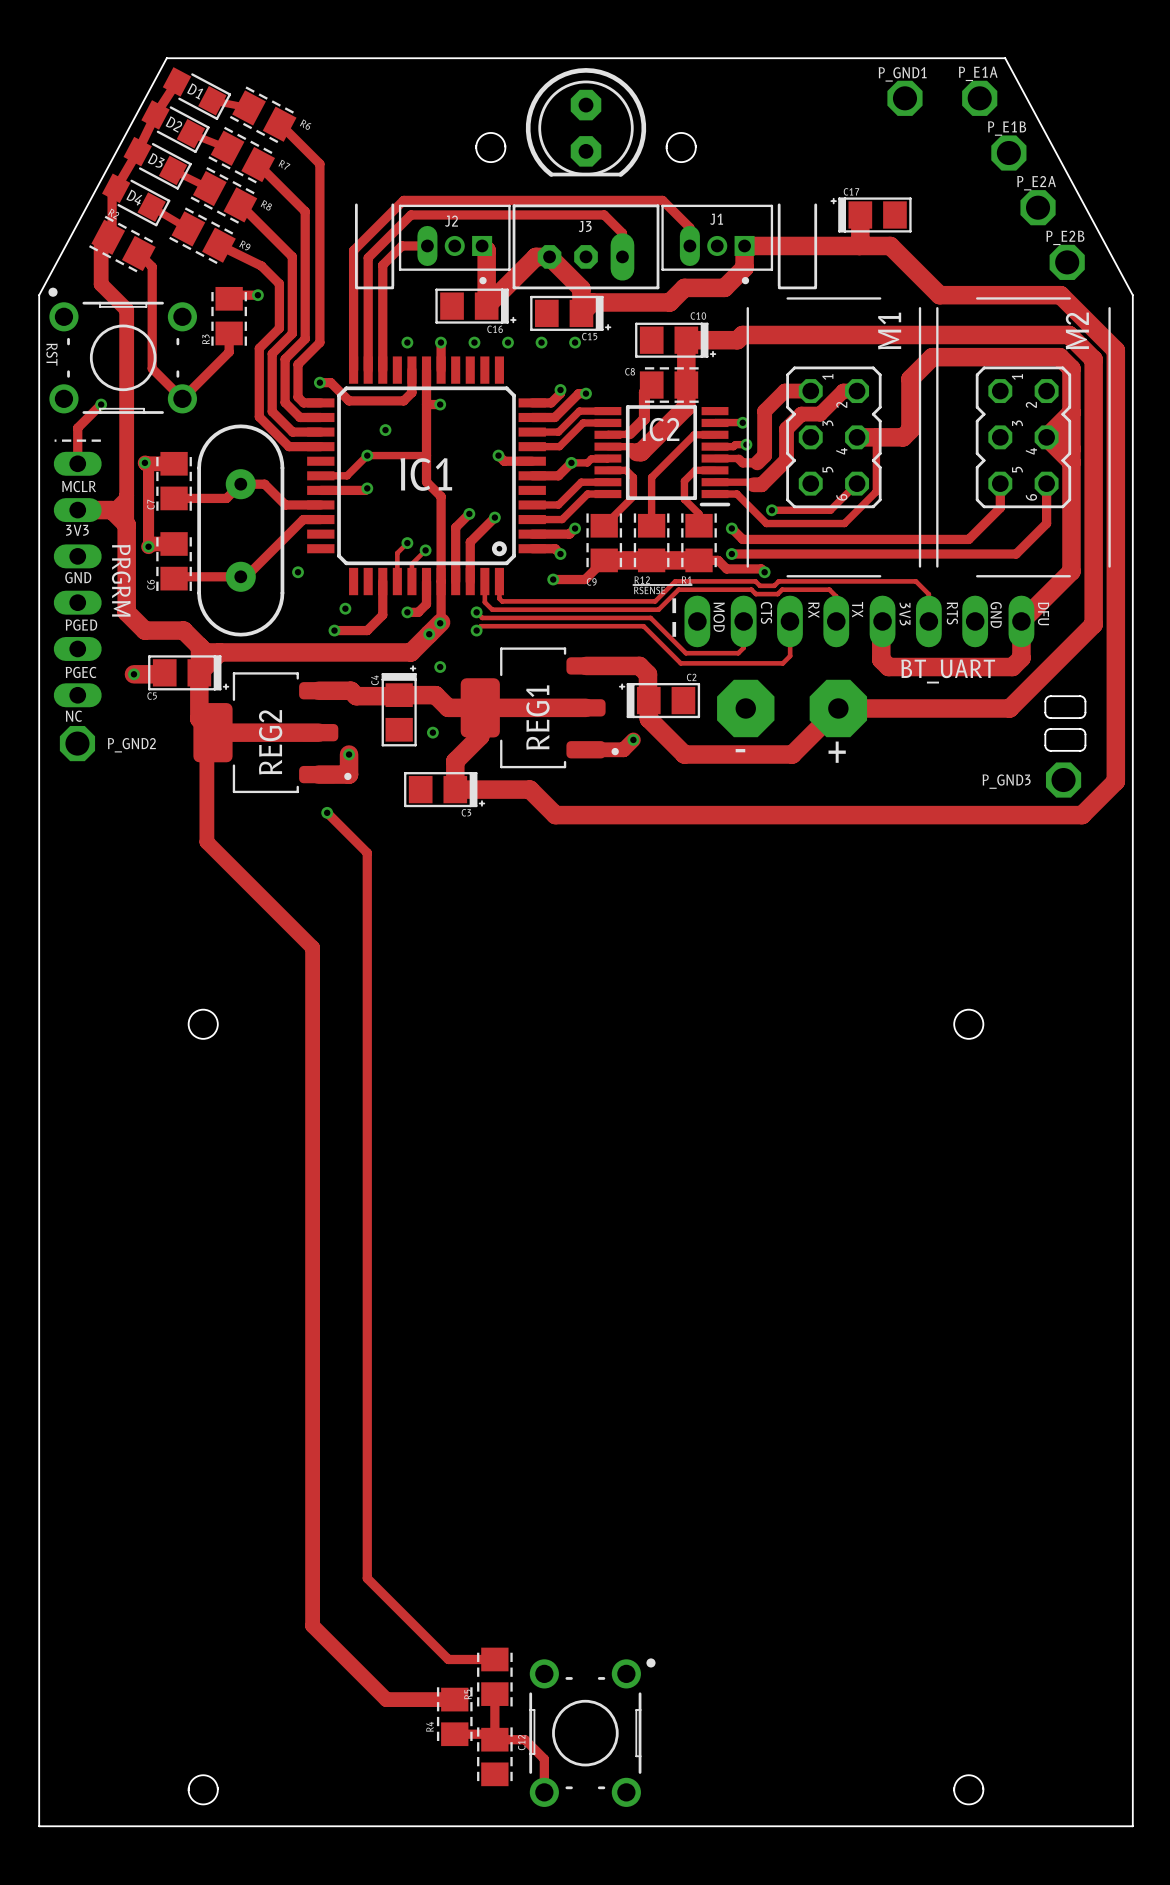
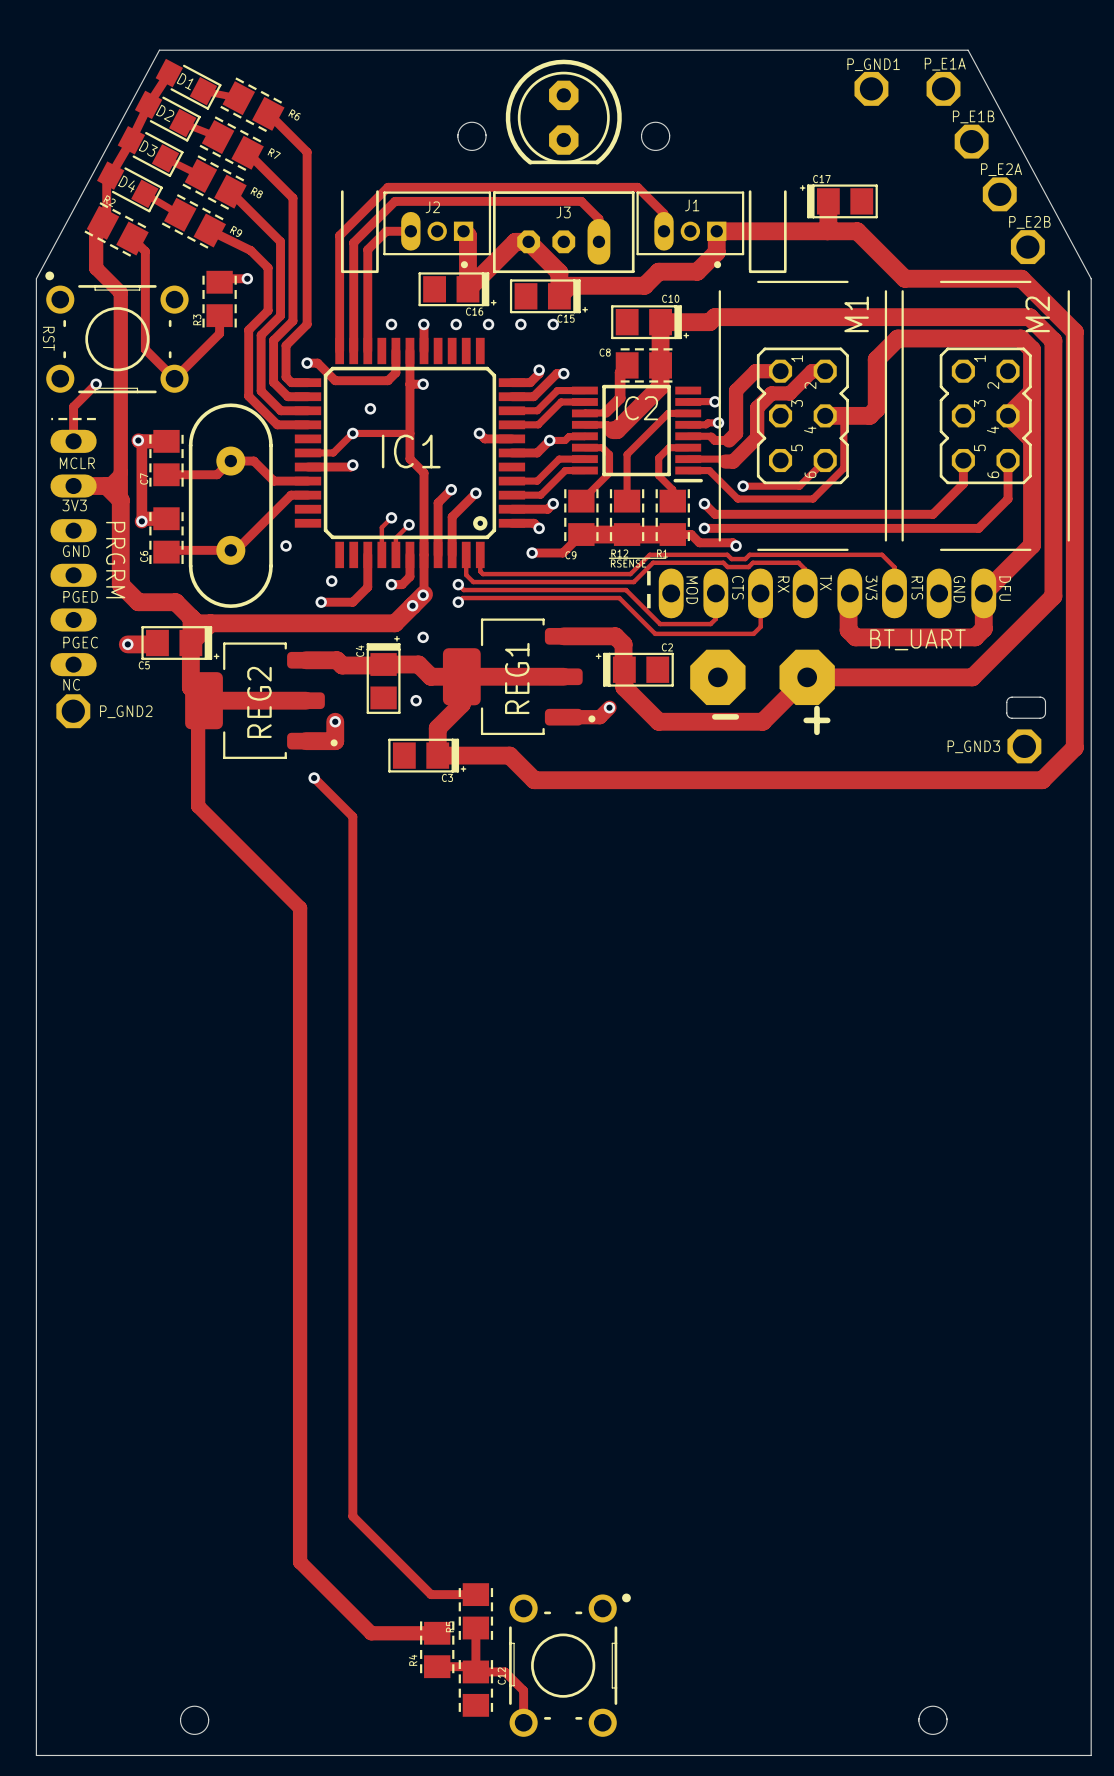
board edge: (1050, 696) (1082, 696) (1085, 700) (1084, 715) (1079, 718) (1048, 717) (1045, 713) (1045, 700) (1050, 696) -> none
round board edge: [188, 1009, 218, 1039] -> none
round board edge: [954, 1009, 984, 1039] -> none

